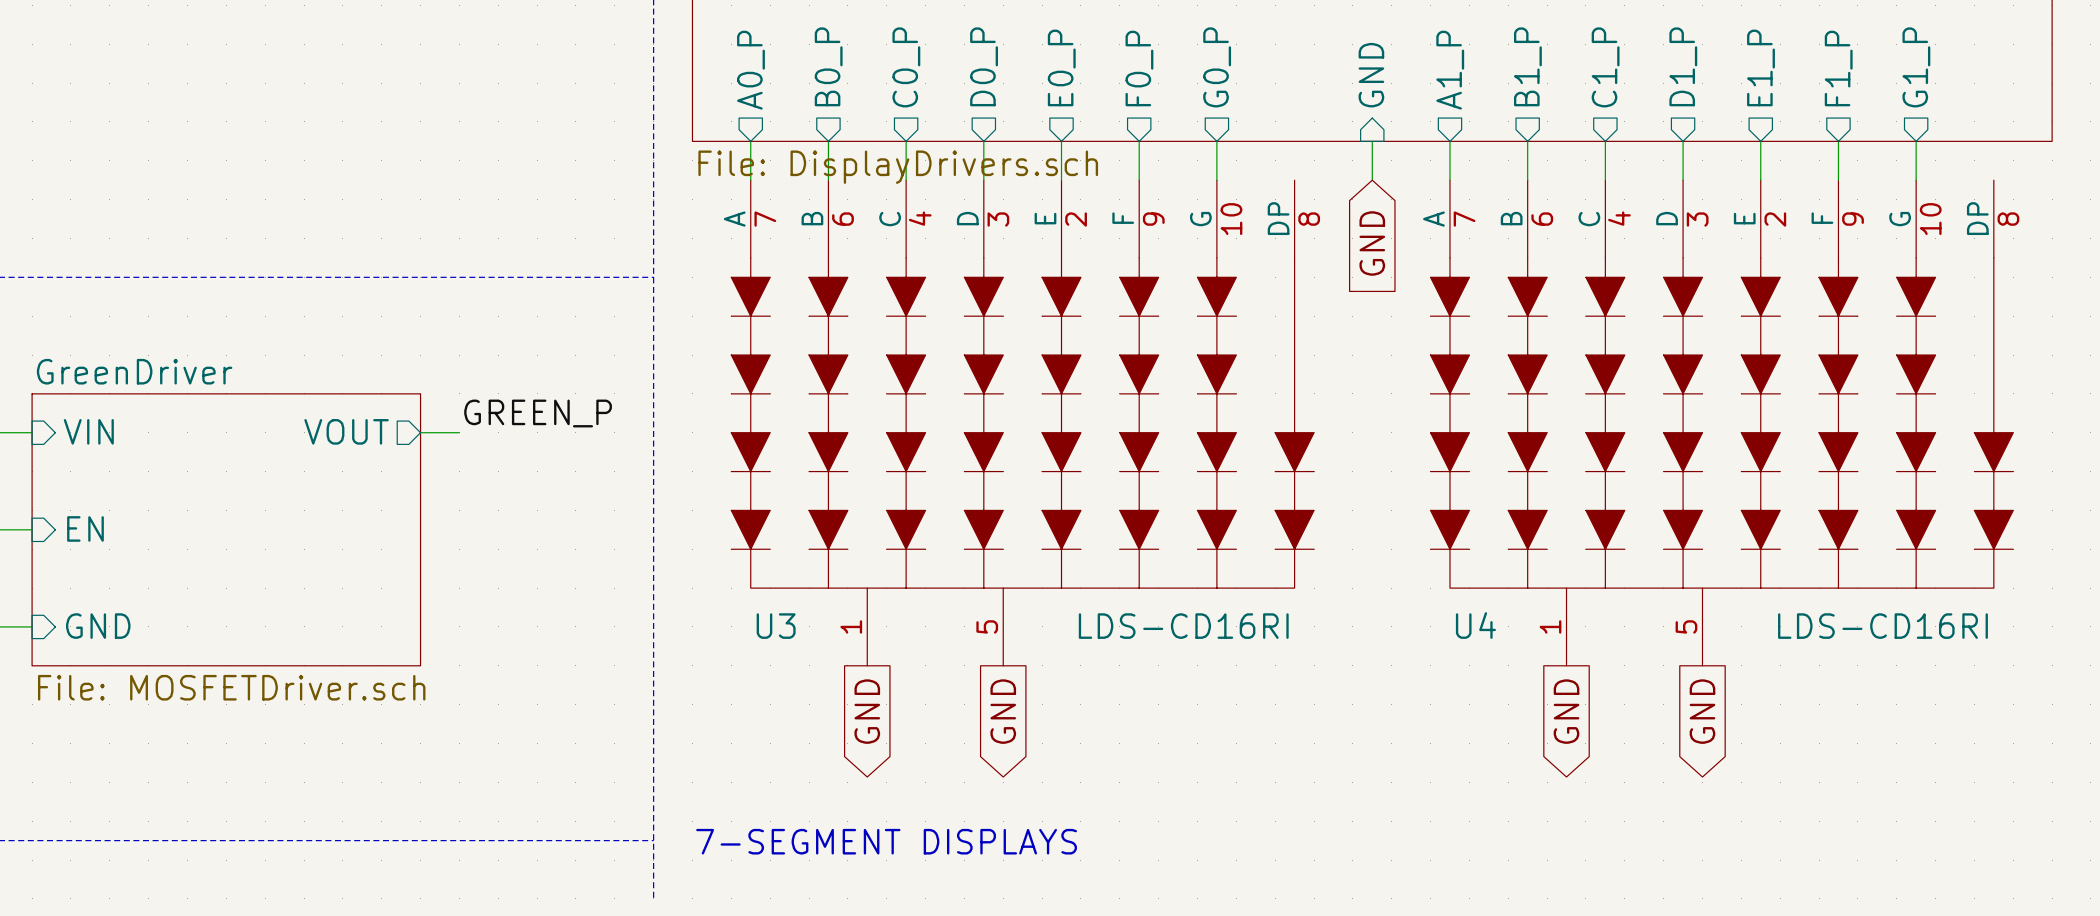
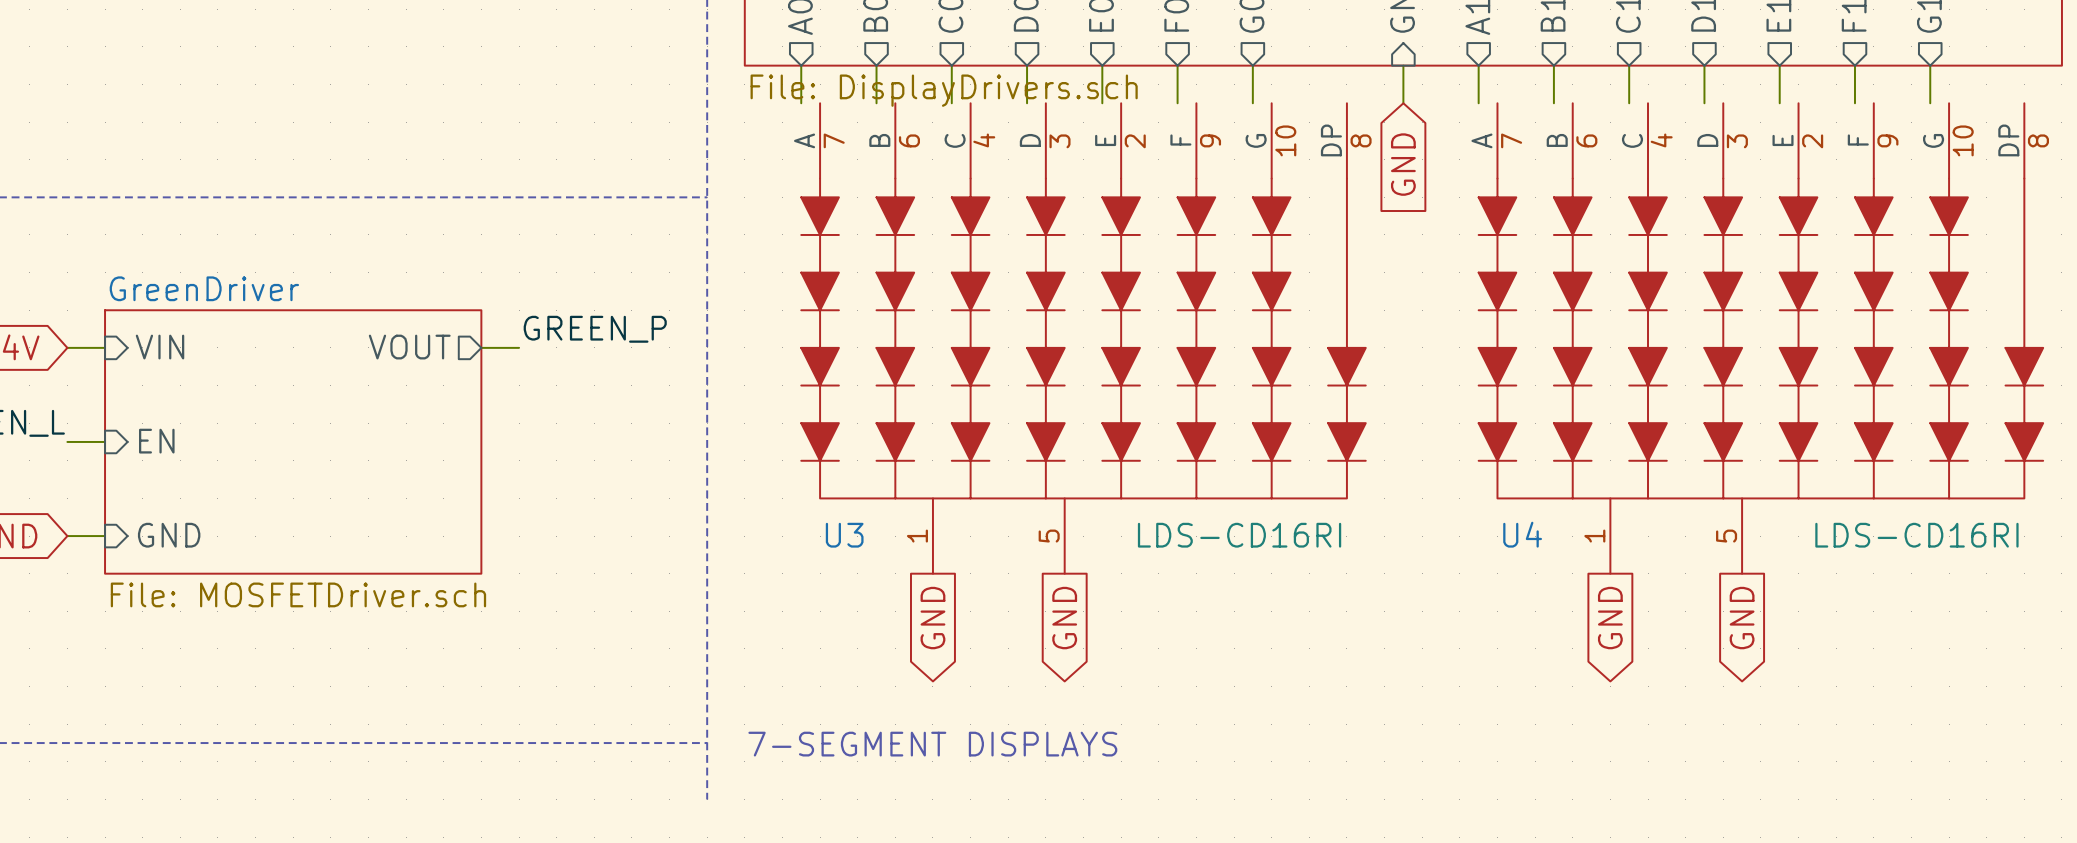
U3 position: (1022, 423) -> (1083, 338)
U4 position: (1721, 423) -> (1760, 338)
global label position: GND (867, 711) -> GND (932, 618)
global label position: GND (1003, 711) -> GND (1064, 618)
global label position: GND (1566, 711) -> GND (1610, 618)
global label position: GND (1702, 711) -> GND (1742, 618)

